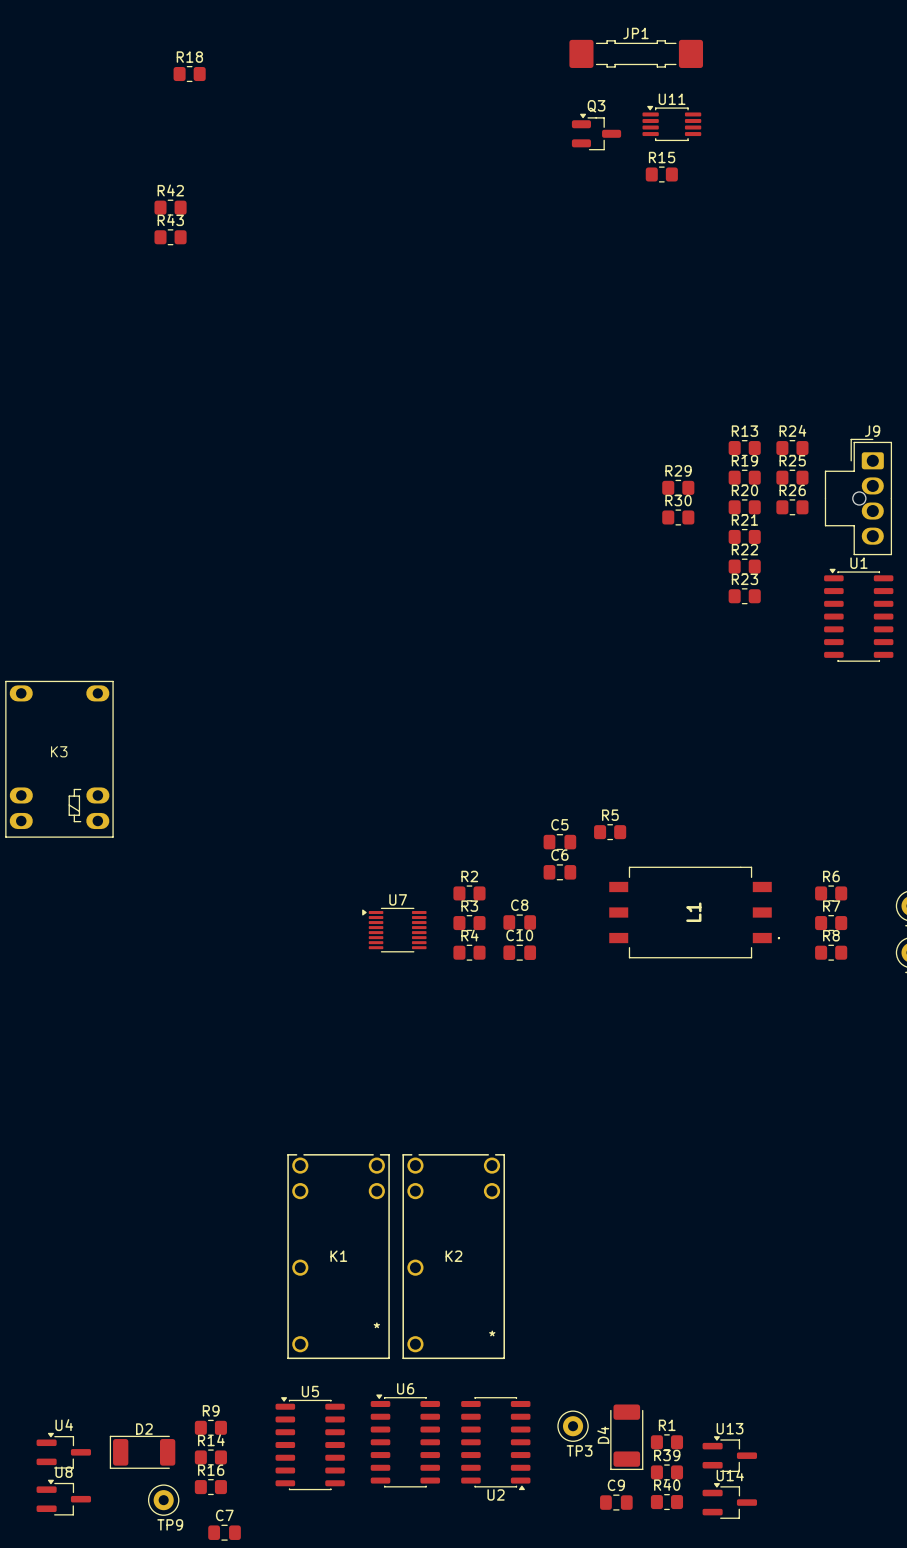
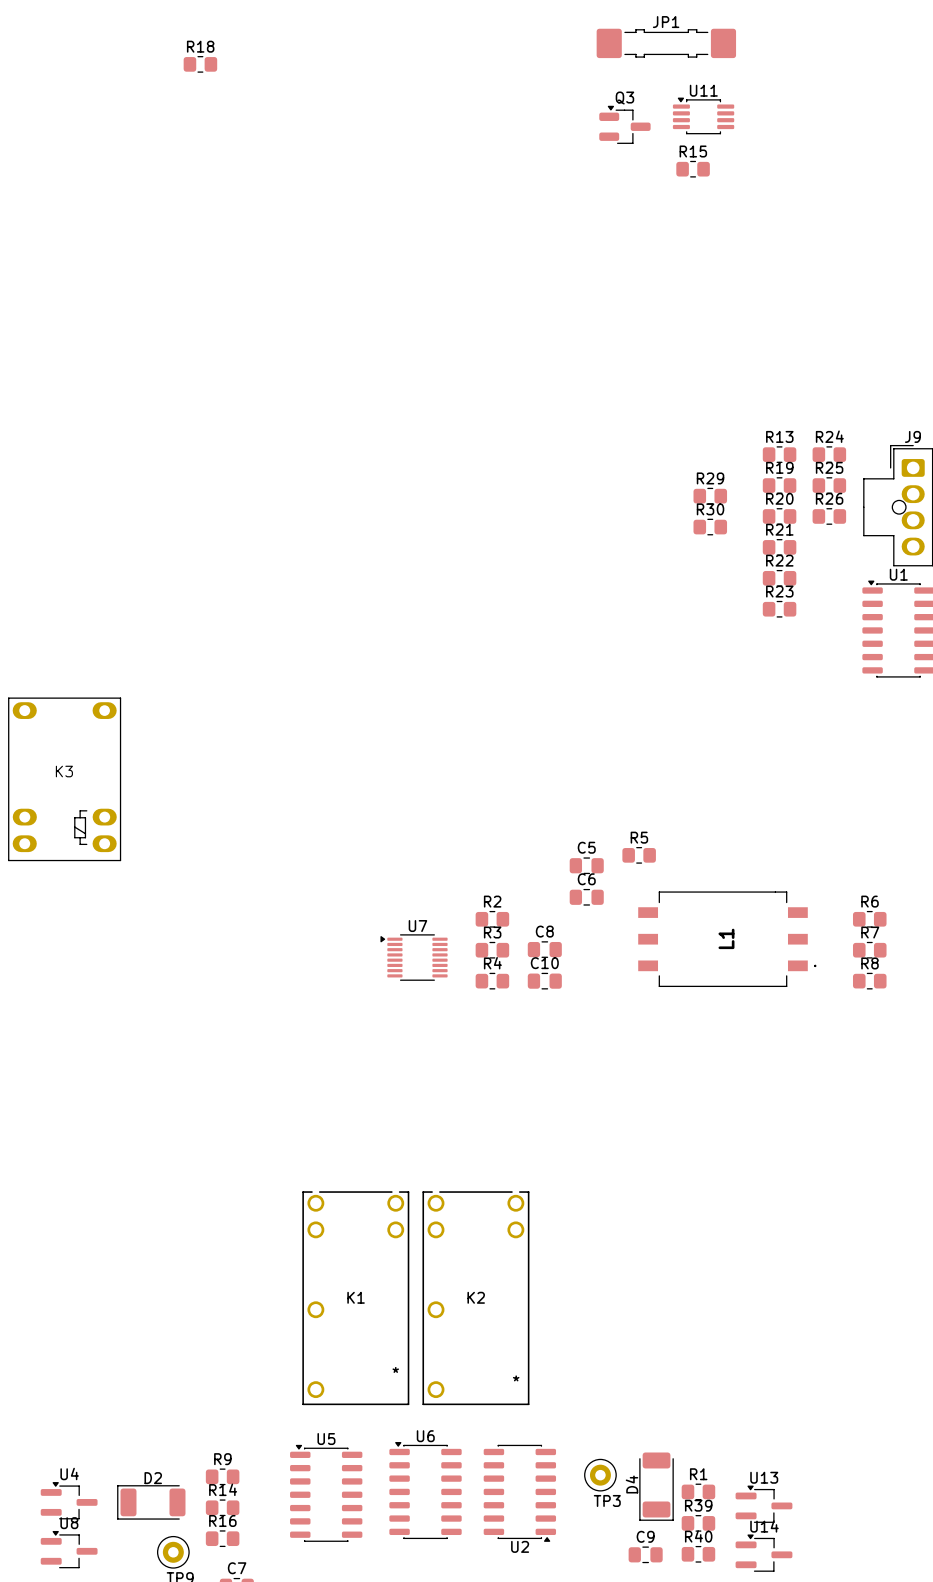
R42: (170, 207) -> none
R43: (170, 237) -> none

